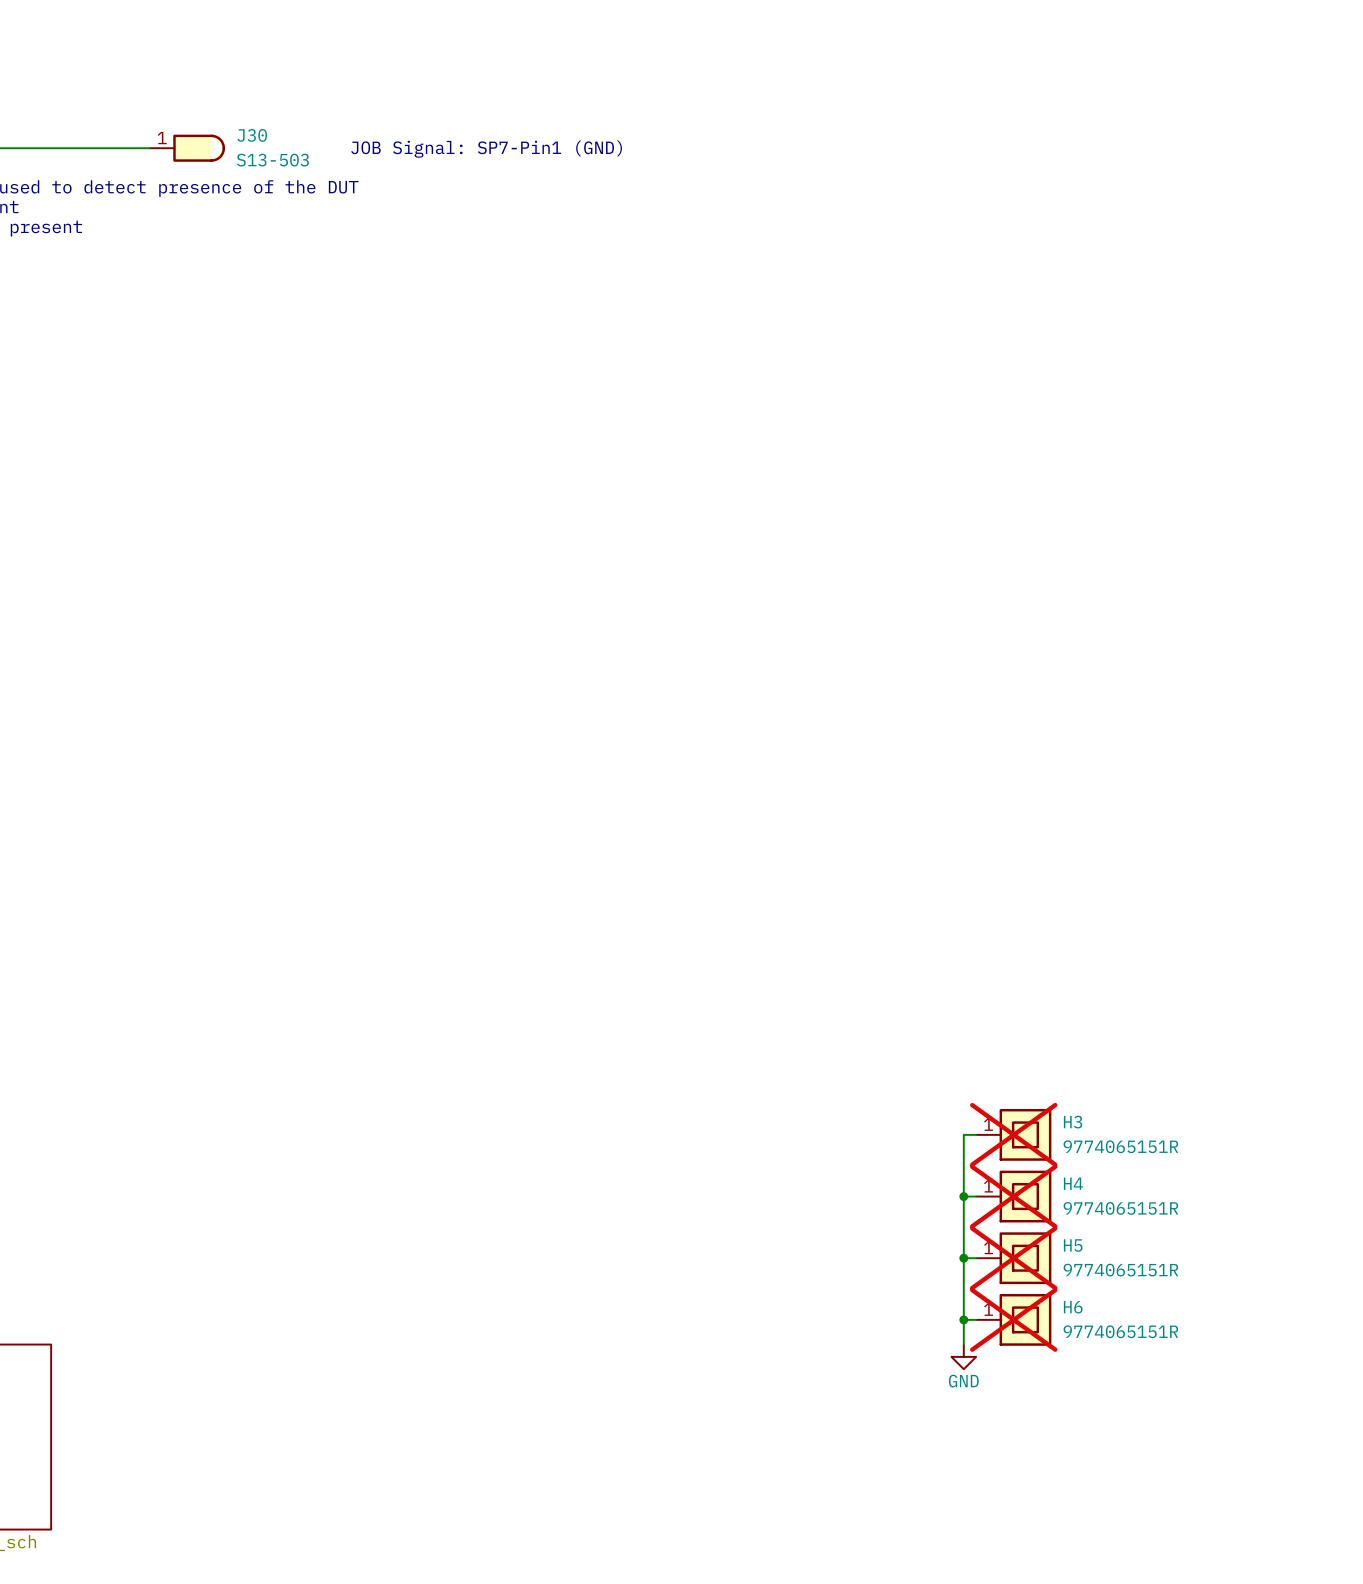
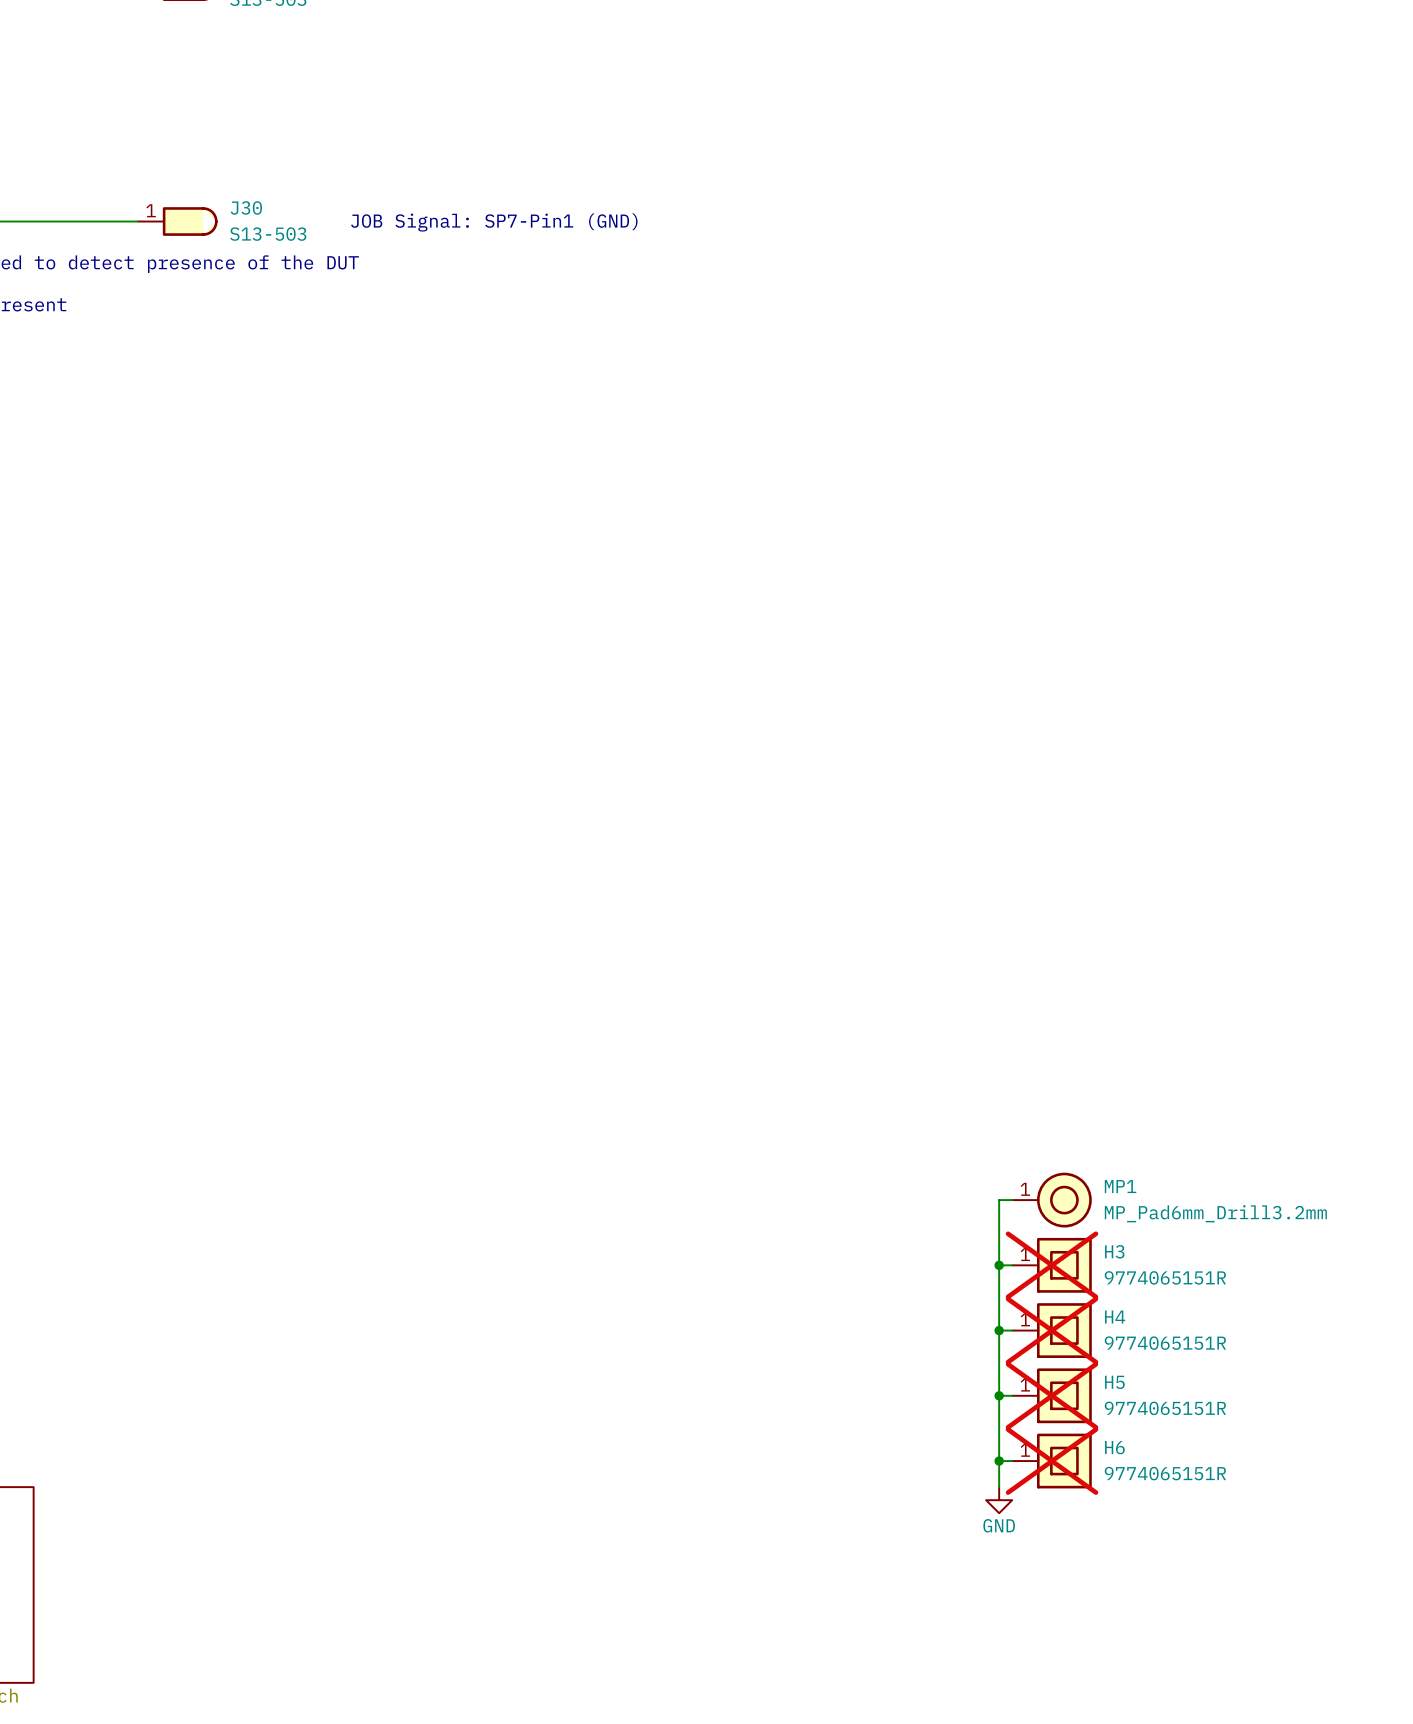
wire: none -> (1012, 1200) (999, 1200) (999, 1265)
MP1: none -> MP_Pad6mm_Drill3.2mm (1052, 1200)
junction: none -> (999, 1265)

